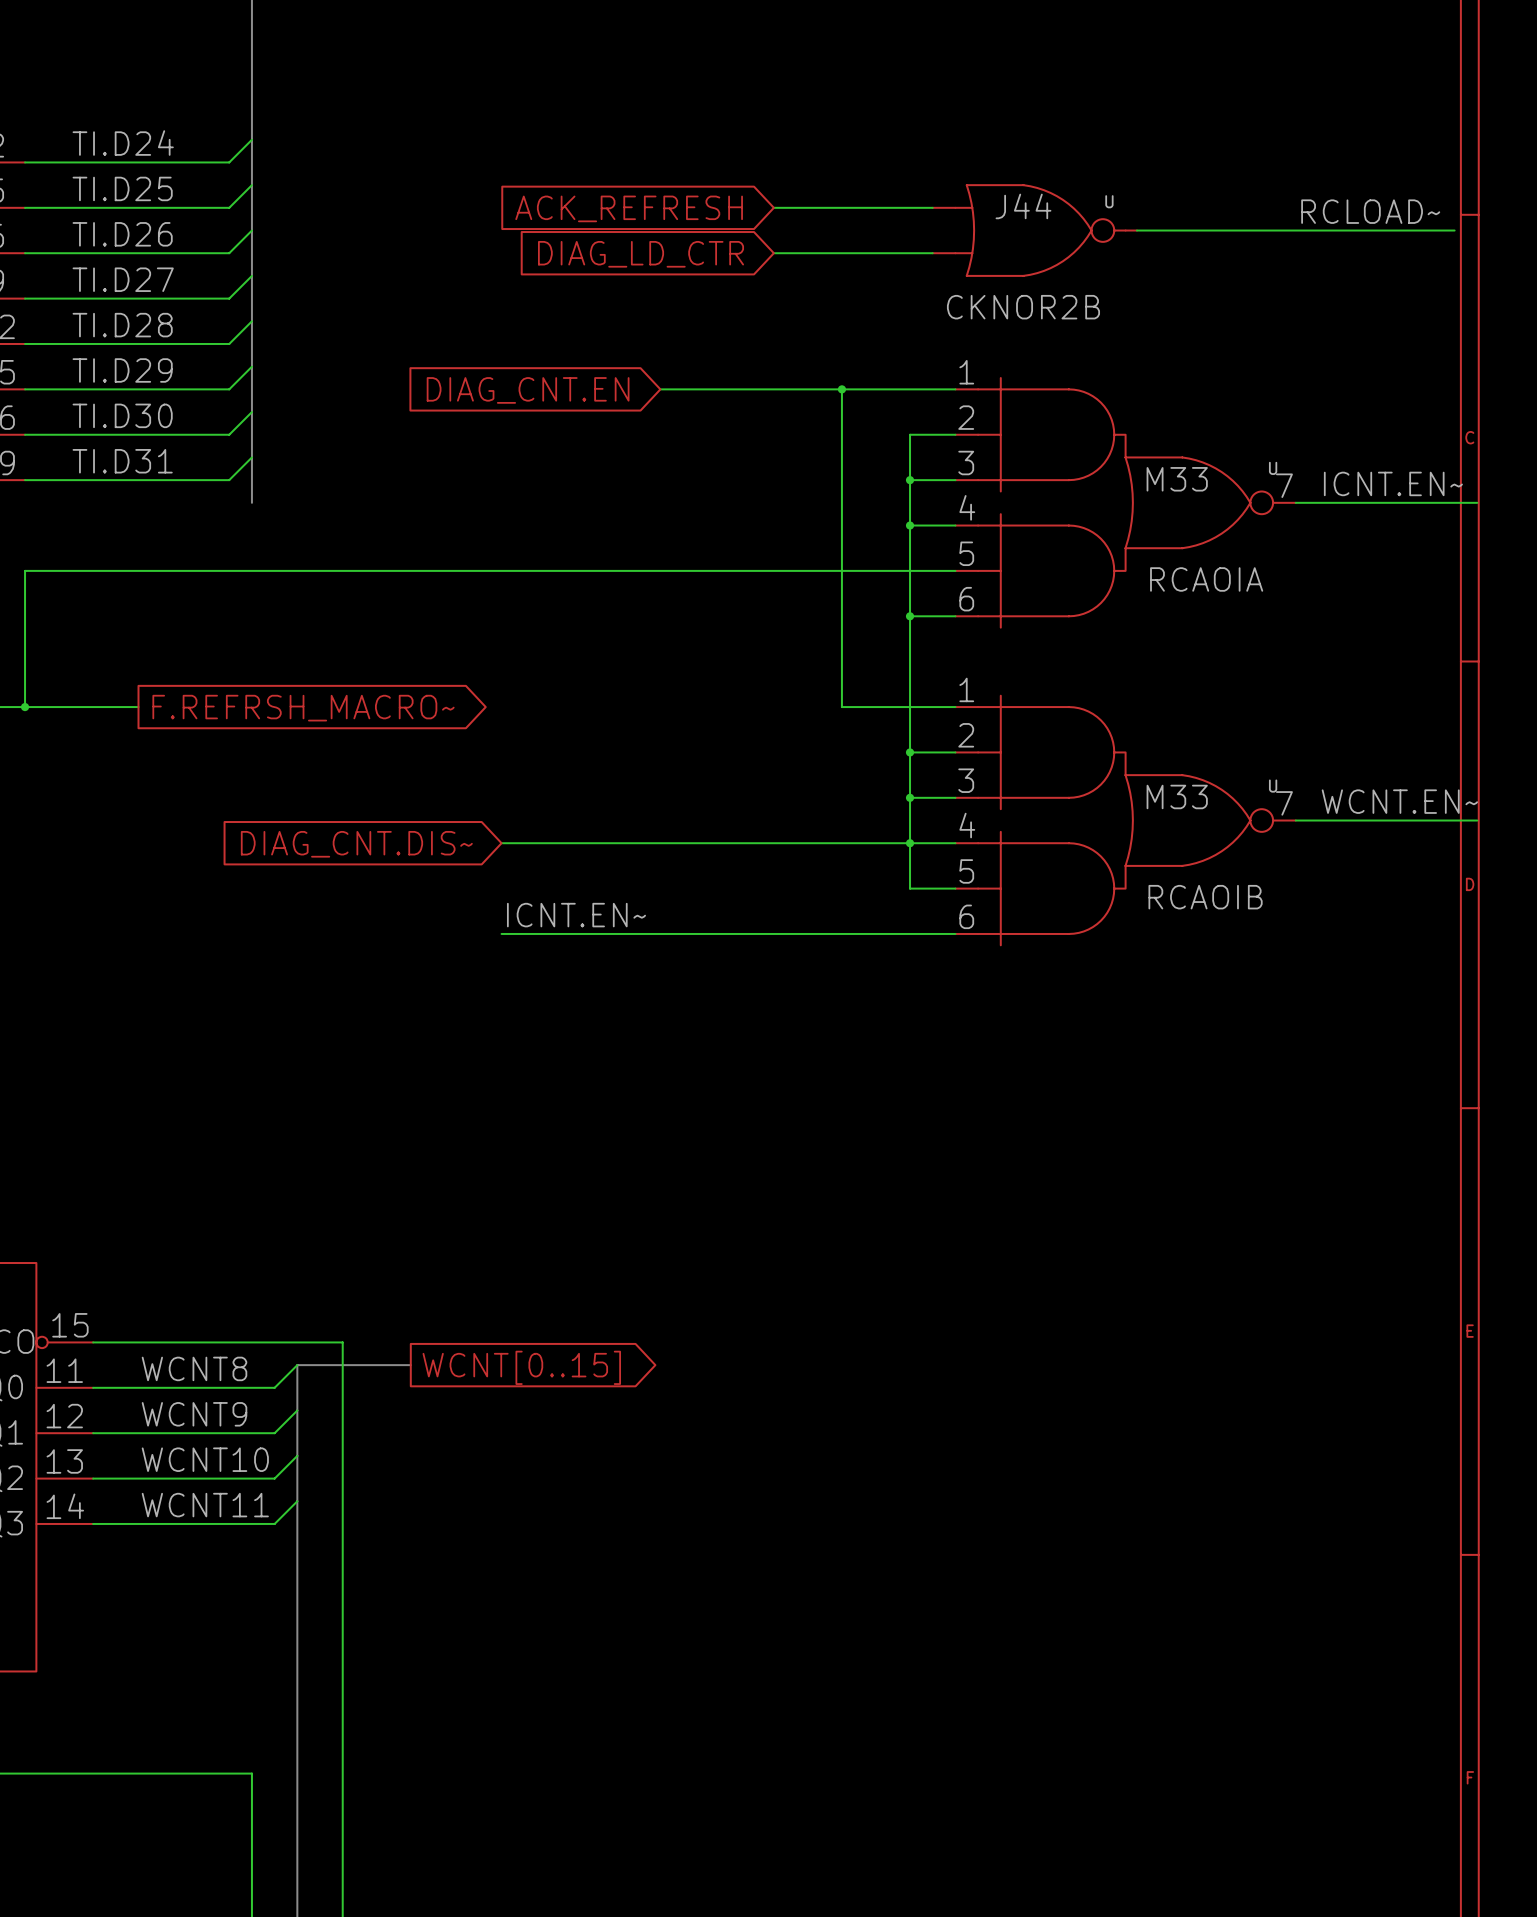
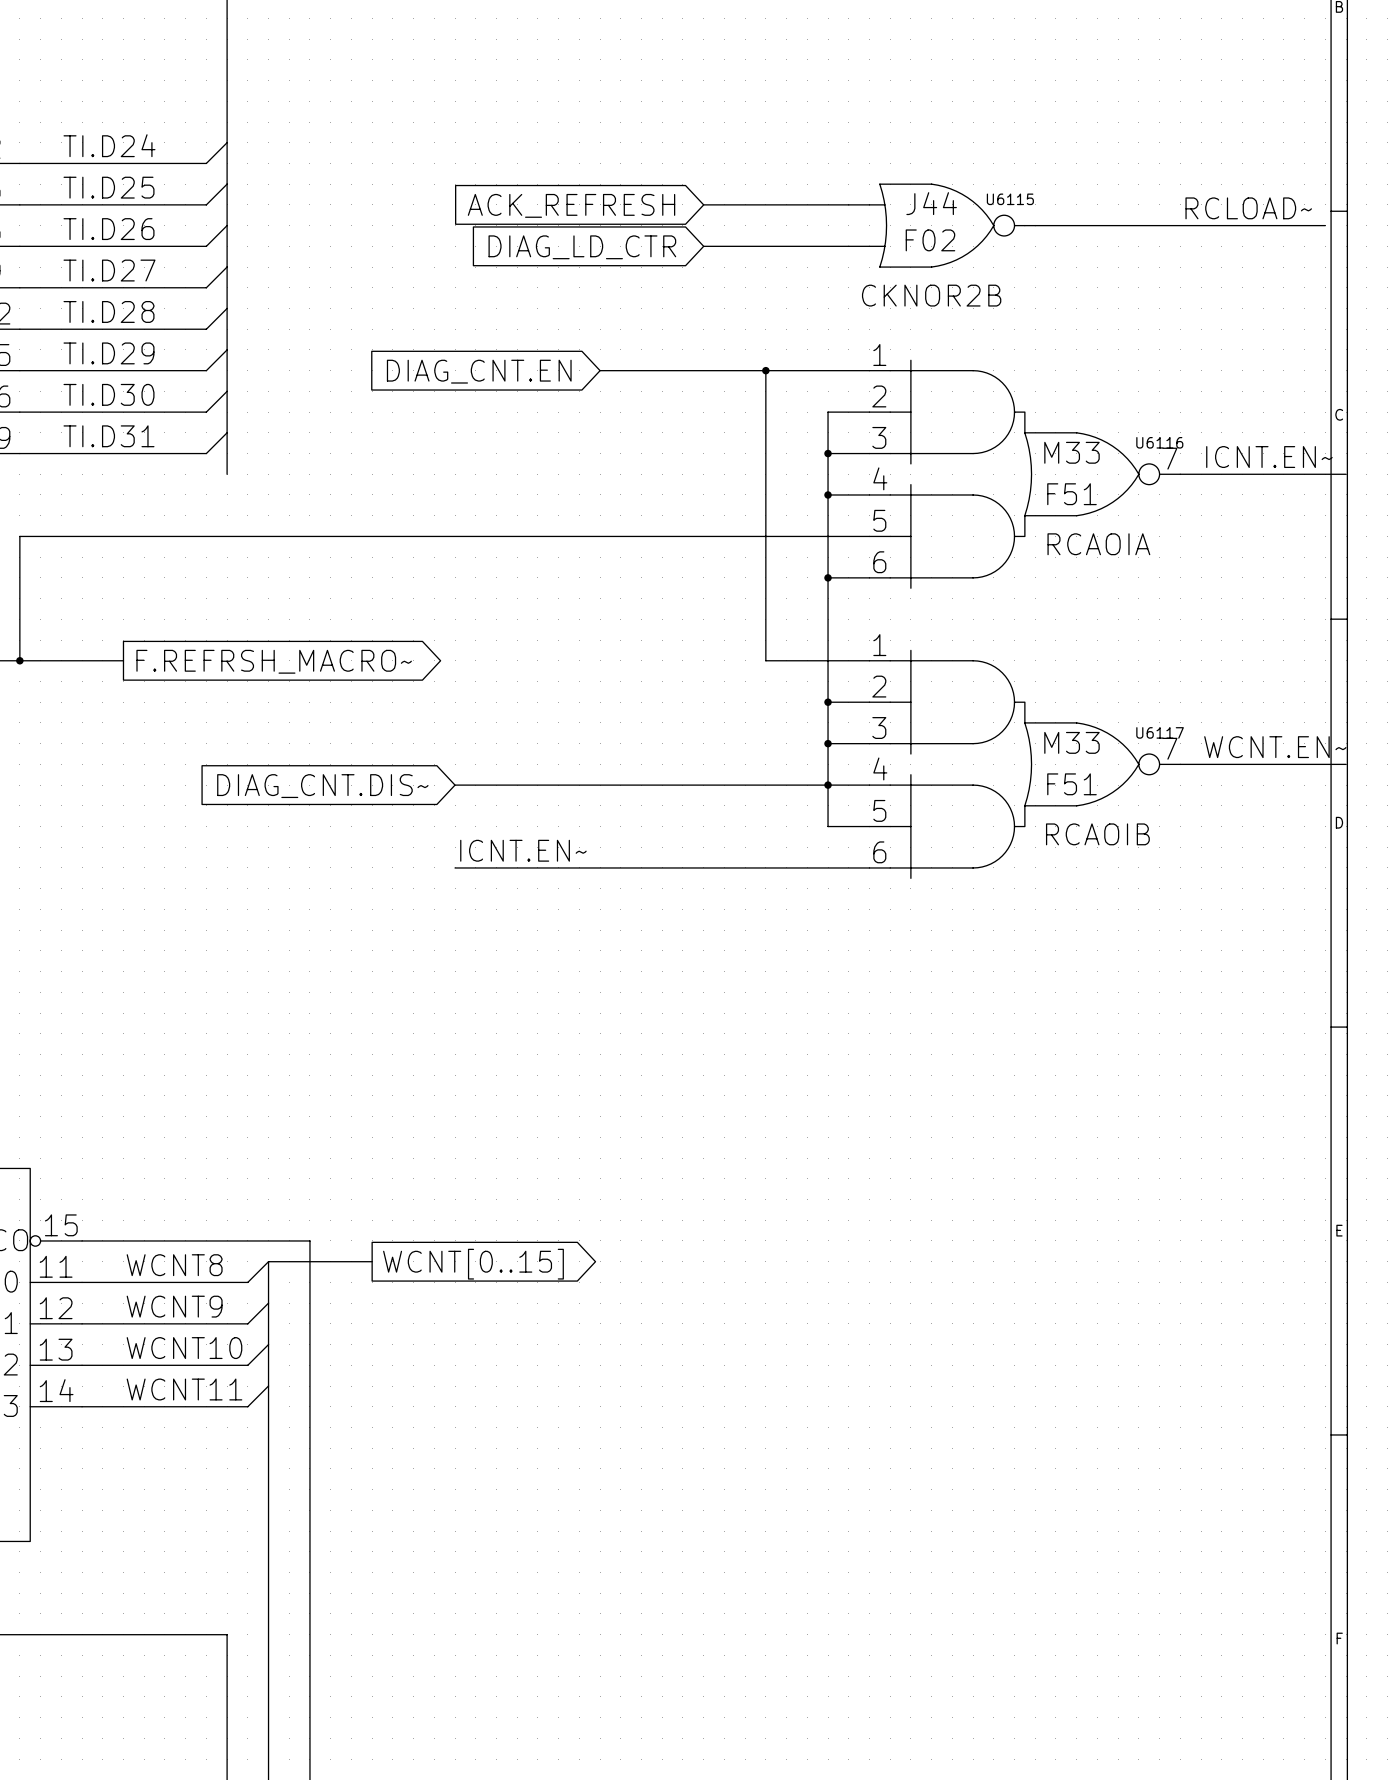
U name: U (1109, 201) -> U6115 (1010, 199)
U value: none -> F02 (930, 240)
U name: U (1273, 468) -> U6116 (1159, 442)
U value: none -> F51 (1071, 494)
U name: U (1273, 786) -> U6117 (1160, 732)
U value: none -> F51 (1071, 784)

